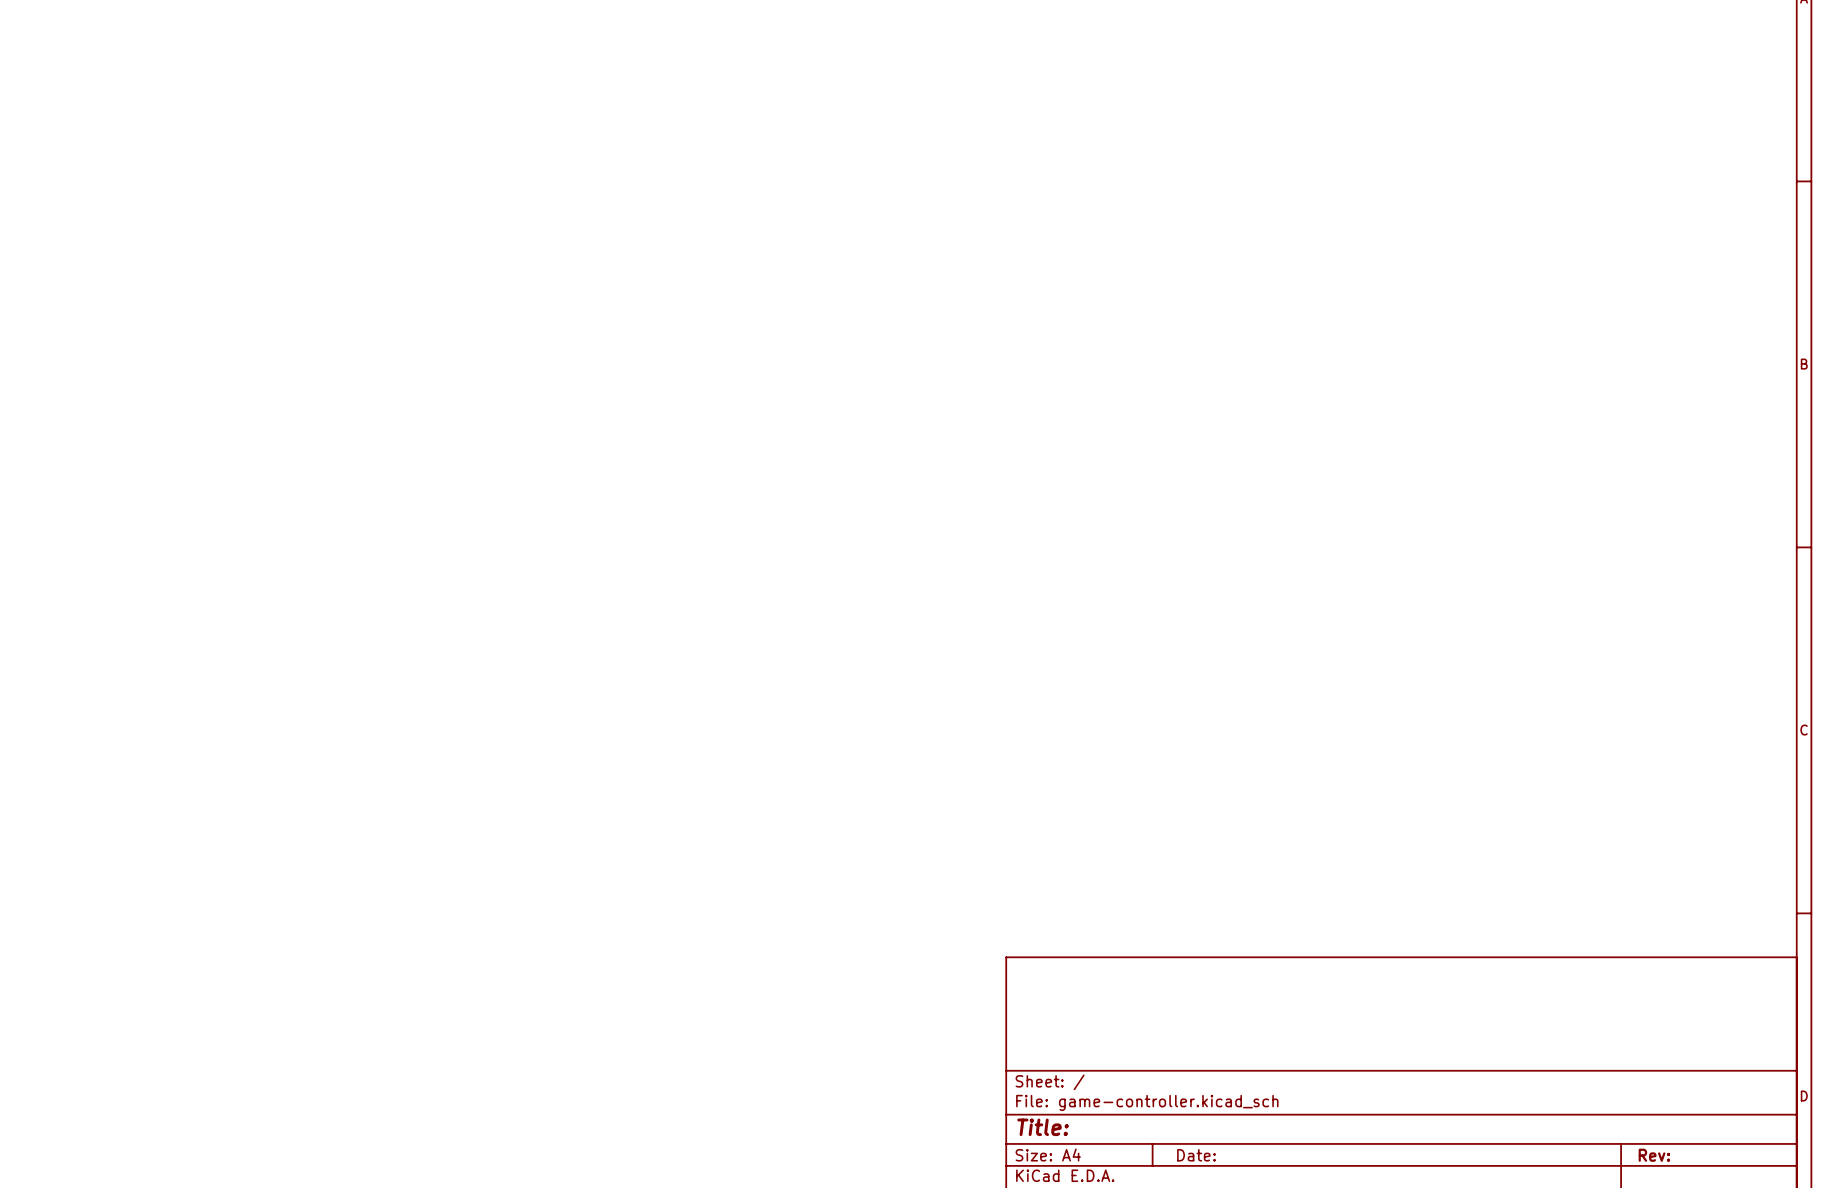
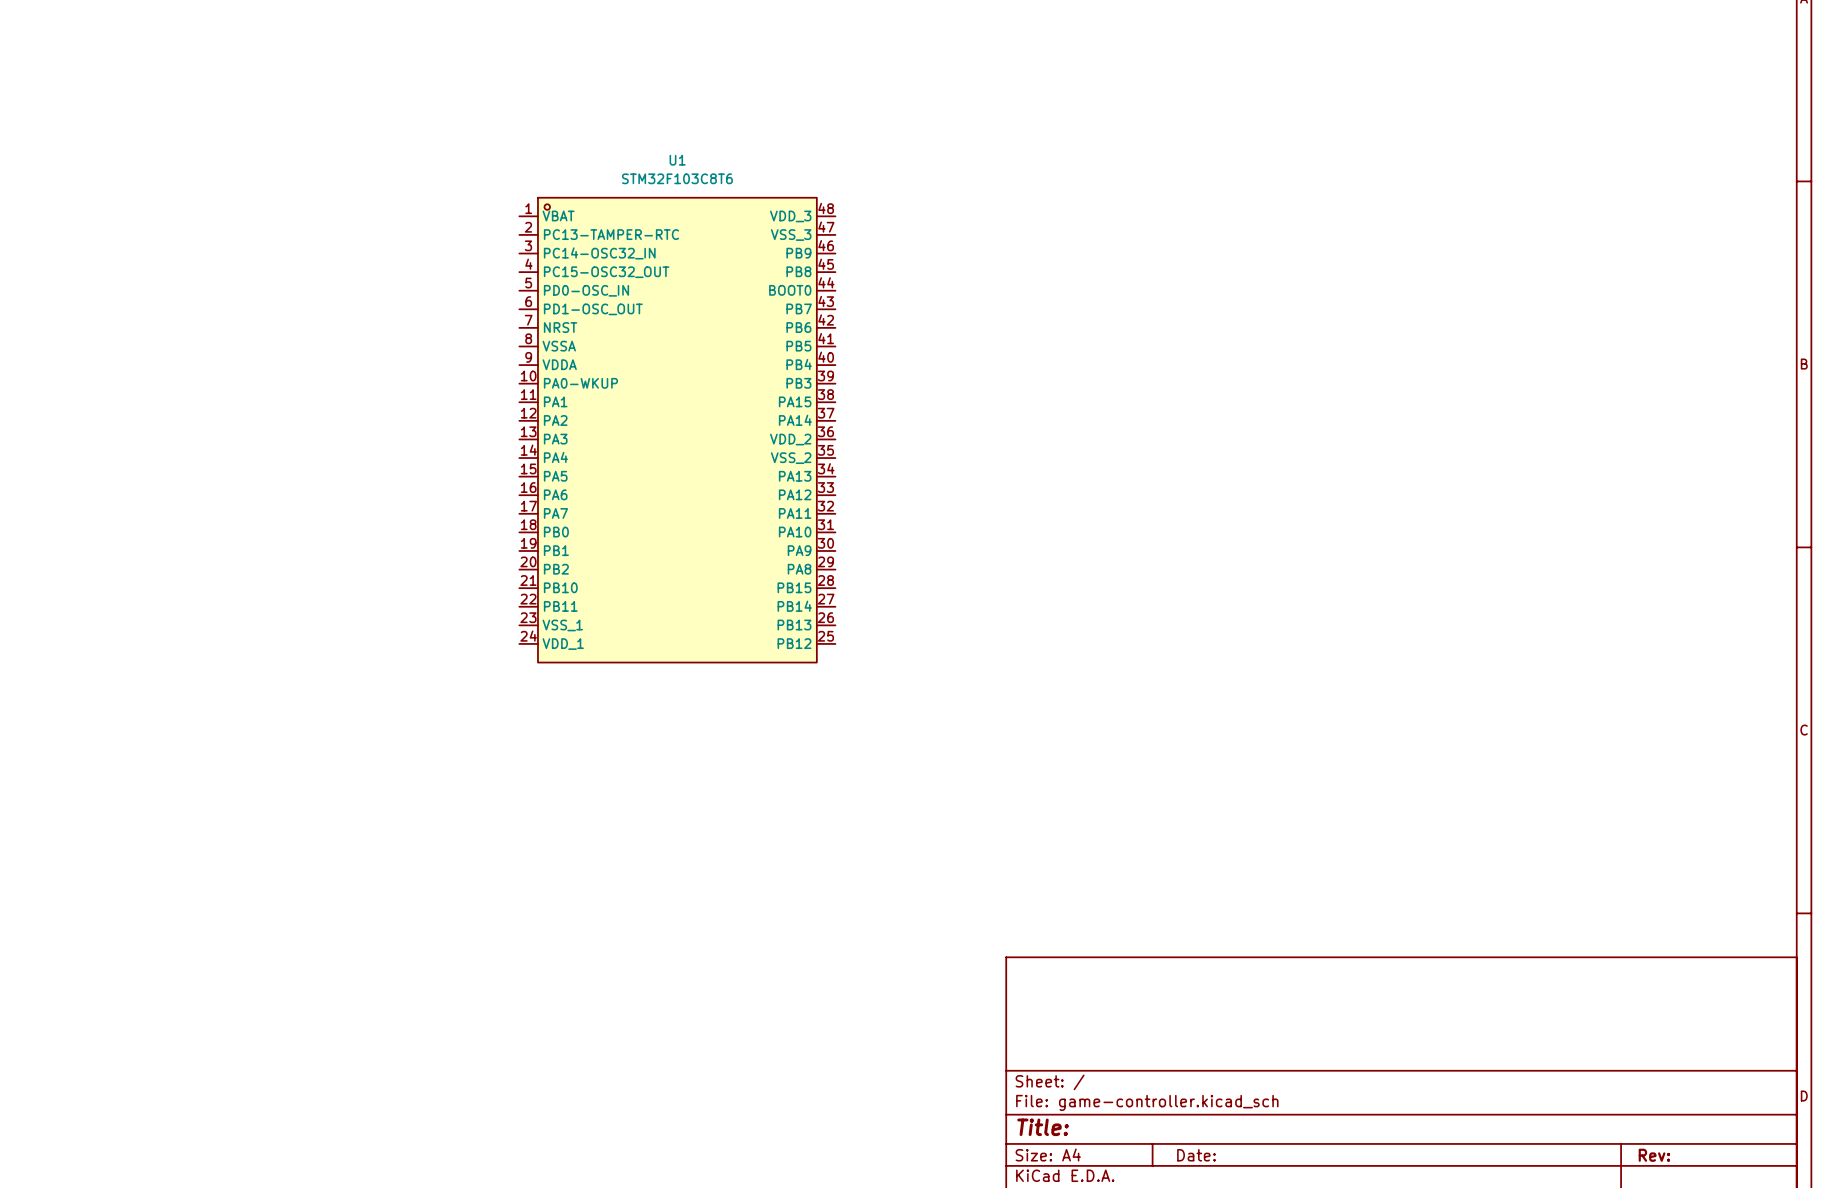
U1: none -> STM32F103C8T6 (677, 430)

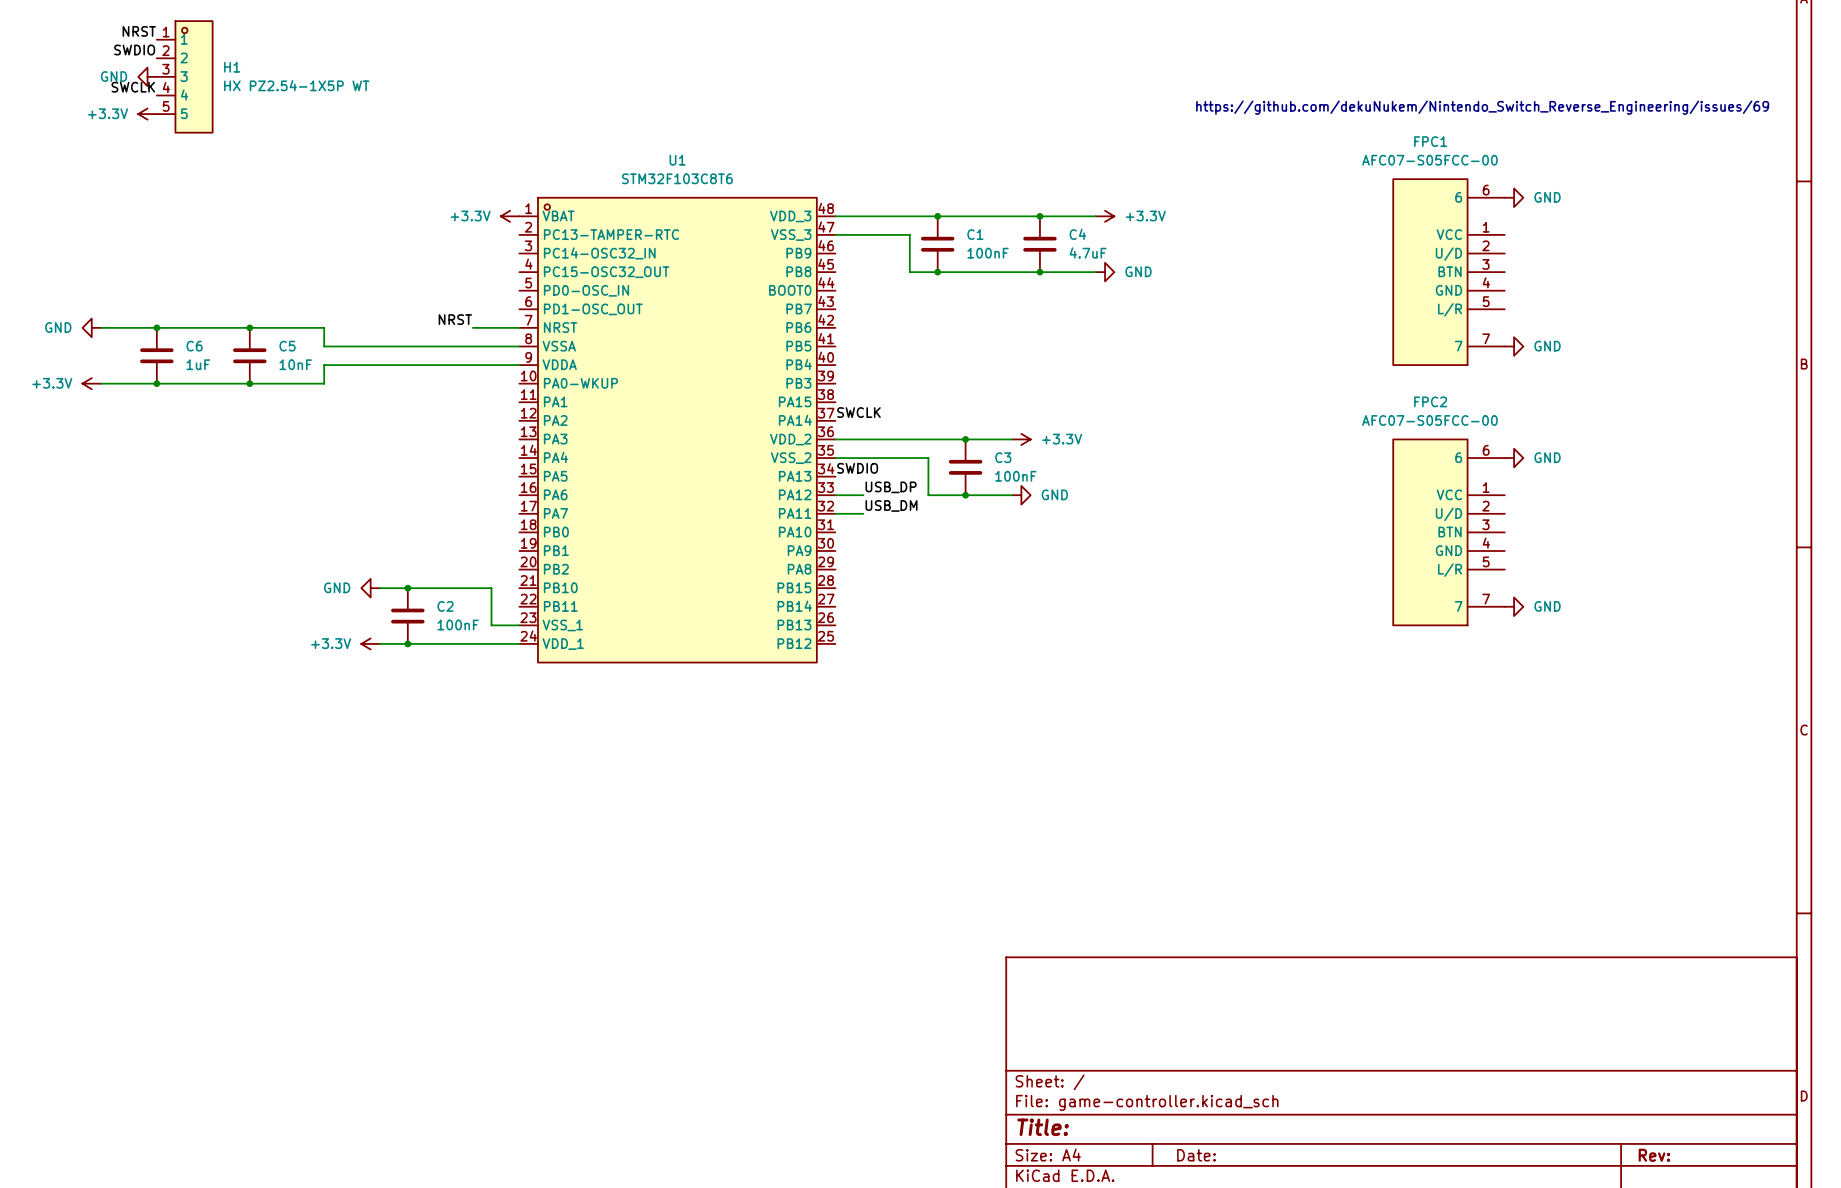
label: none -> NRST (139, 31)
label: none -> SWDIO (134, 50)
power symbol: none -> GND (147, 76)
H1: none -> HX PZ2.54-1X5P WT (184, 76)
label: none -> SWCLK (133, 87)
text: none -> https://github.com/dekuNukem/Nintendo_Switch_Reverse_Engineering/issues/69 (1482, 107)
power symbol: none -> +3.3V (147, 114)
power symbol: none -> GND (1514, 197)
power symbol: none -> +3.3V (510, 216)
wire: none -> (835, 216) (1095, 216)
junction: none -> (937, 216)
junction: none -> (1039, 216)
power symbol: none -> +3.3V (1105, 216)
wire: none -> (835, 234) (909, 234) (909, 272) (1095, 272)
C1: none -> 100nF (937, 244)
C4: none -> 4.7uF (1039, 244)
junction: none -> (937, 272)
junction: none -> (1039, 272)
power symbol: none -> GND (1105, 272)
FPC1: none -> AFC07-S05FCC-00 (1448, 272)
label: none -> NRST (455, 319)
power symbol: none -> GND (91, 327)
wire: none -> (101, 327) (324, 327) (324, 346) (519, 346)
junction: none -> (156, 327)
junction: none -> (249, 327)
wire: none -> (472, 327) (519, 327)
power symbol: none -> GND (1514, 346)
C6: none -> 1uF (156, 355)
C5: none -> 10nF (249, 355)
wire: none -> (519, 365) (324, 365) (324, 383) (101, 383)
power symbol: none -> +3.3V (91, 383)
junction: none -> (156, 383)
junction: none -> (249, 383)
label: none -> SWCLK (858, 412)
wire: none -> (835, 439) (1012, 439)
junction: none -> (965, 439)
power symbol: none -> +3.3V (1021, 439)
wire: none -> (835, 458) (928, 458) (928, 495) (1012, 495)
power symbol: none -> GND (1514, 458)
C3: none -> 100nF (965, 467)
label: none -> SWDIO (857, 468)
label: none -> USB_DP (891, 487)
wire: none -> (835, 495) (863, 495)
junction: none -> (965, 495)
power symbol: none -> GND (1021, 495)
label: none -> USB_DM (891, 505)
wire: none -> (835, 513) (863, 513)
FPC2: none -> AFC07-S05FCC-00 (1448, 532)
power symbol: none -> GND (370, 588)
wire: none -> (379, 588) (491, 588) (491, 625) (519, 625)
junction: none -> (407, 588)
power symbol: none -> GND (1514, 606)
C2: none -> 100nF (407, 616)
power symbol: none -> +3.3V (370, 643)
wire: none -> (379, 643) (519, 643)
junction: none -> (407, 643)

